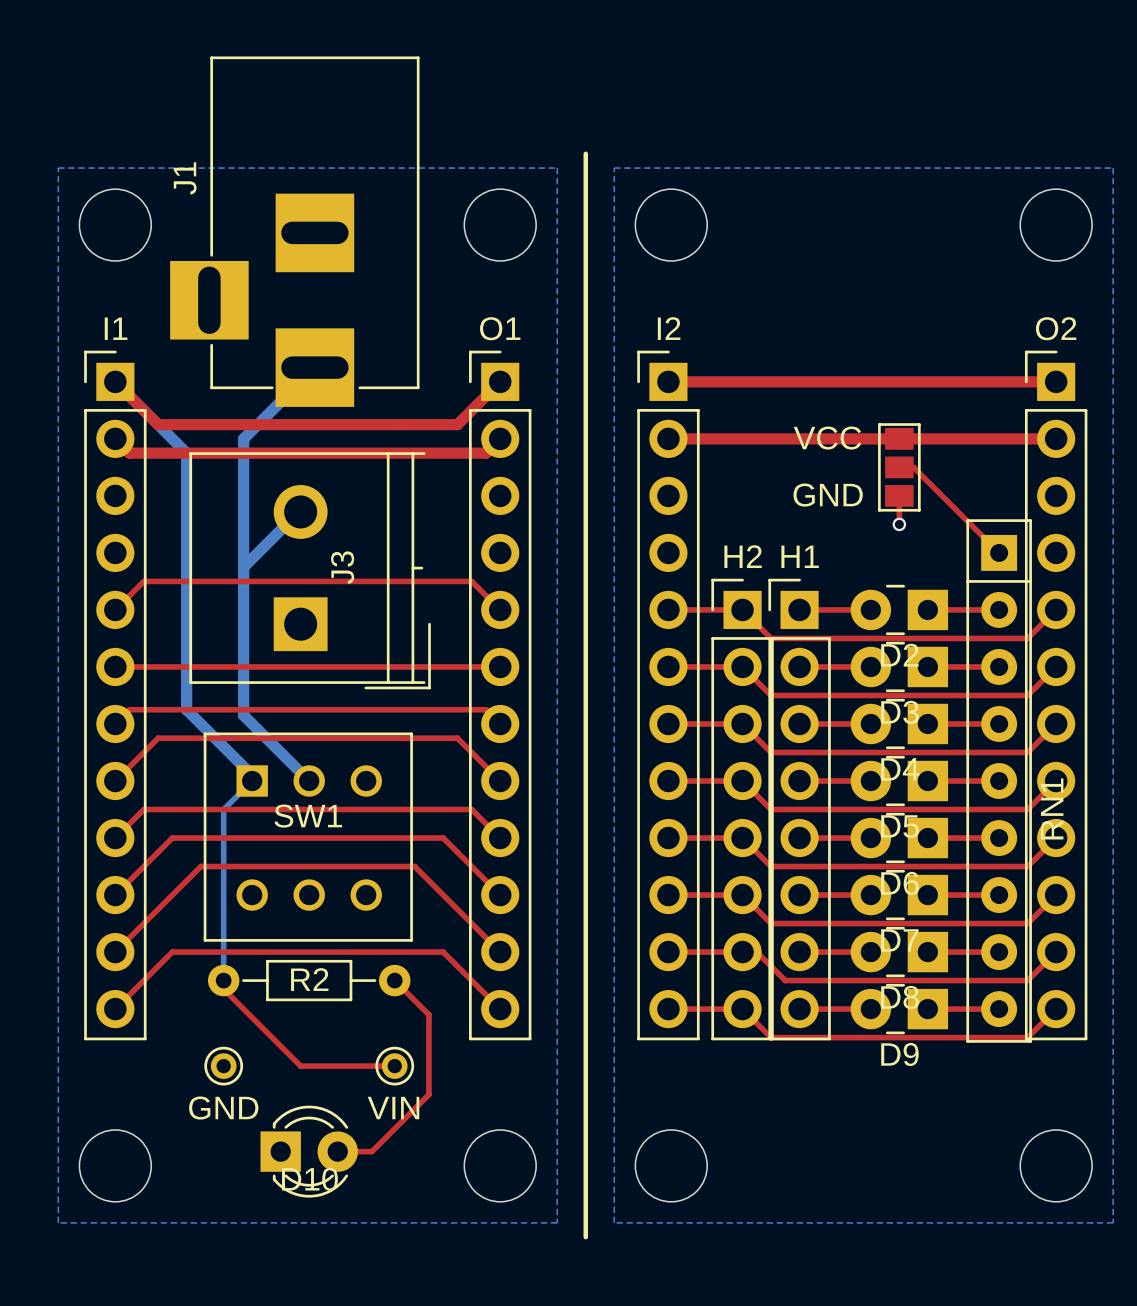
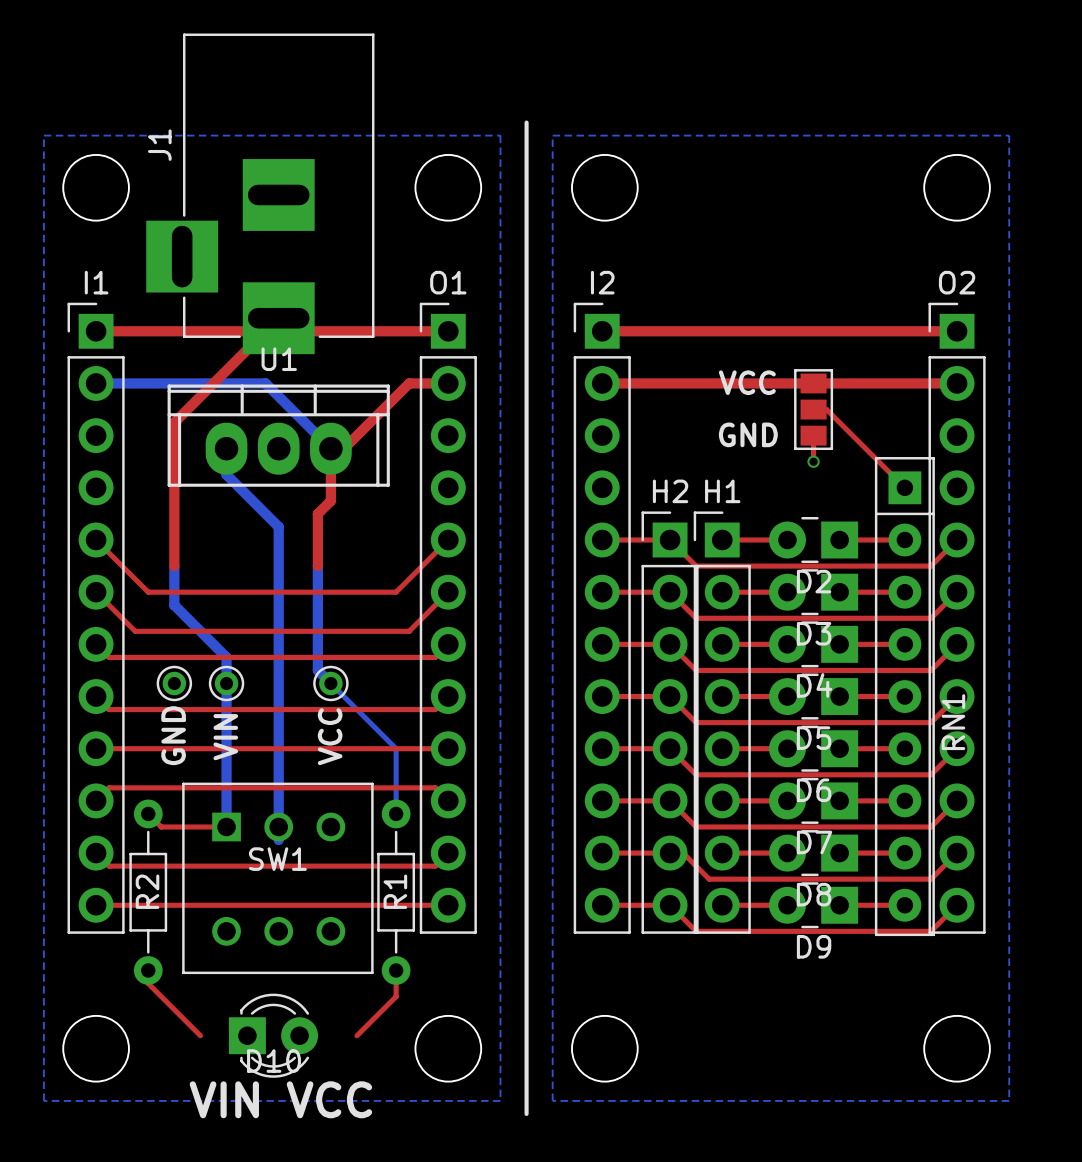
top track: none -> (278, 318) (174, 422) (174, 566)
bottom track: (314, 367) (243, 438) (243, 715) (309, 781) -> none
top track: (115, 381) (158, 424) (457, 424) (500, 381) -> (96, 331) (252, 331)
bottom track: (115, 381) (186, 453) (186, 709) (252, 775) (252, 781) (223, 809) (223, 980) -> none
top track: none -> (304, 331) (448, 331)
top track: (115, 438) (129, 453) (485, 453) (500, 438) -> (317, 566) (317, 513) (330, 500) (330, 448) (343, 448) (409, 383) (448, 383)
bottom track: none -> (96, 383) (265, 383) (330, 448)
U1: none -> (278, 435)
bottom track: none -> (226, 448) (226, 474) (278, 526) (278, 840)
bottom track: (300, 511) (243, 567) -> none
J3: (310, 570) -> none
top track: (115, 609) (143, 581) (471, 581) (500, 609) -> (96, 540) (148, 592)
top track: none -> (448, 540) (396, 592)
bottom track: none -> (174, 566) (174, 605) (226, 657) (226, 826)
bottom track: none -> (317, 566) (317, 670) (396, 748) (396, 813)
top track: (115, 666) (172, 666) -> (96, 592) (135, 631)
top track: (443, 666) (500, 666) -> (409, 631) (448, 592)
top track: (158, 709) (129, 709) (115, 723) -> (135, 657) (109, 657) (96, 644)
top track: (457, 709) (485, 709) (500, 723) -> (409, 657) (435, 657) (448, 644)
top track: (158, 738) (115, 781) -> (448, 696) (435, 709) (109, 709) (96, 696)
top track: (457, 738) (500, 781) -> none
part: none -> (174, 683)
part: none -> (226, 683)
part: none -> (330, 683)
text: none -> VCC (330, 736)
text: none -> VIN (225, 737)
SW1 position: (308, 837) -> (277, 878)
top track: (115, 838) (143, 809) (471, 809) (500, 838) -> none
top track: (172, 838) (129, 880) -> (148, 748) (96, 748)
top track: (443, 838) (485, 880) -> (396, 748) (448, 748)
top track: none -> (109, 787) (435, 787)
top track: none -> (148, 813) (161, 826) (226, 826)
top track: (115, 952) (200, 866) (414, 866) (500, 952) -> (96, 853) (109, 866) (435, 866) (448, 853)
top track: (223, 980) (223, 989) (300, 1066) (394, 1066) -> none
R2 rotation: 0° (309, 980) -> 90° clockwise (148, 892)
R2 position: (309, 980) -> (148, 892)
top track: (394, 980) (428, 1014) (428, 1094) (371, 1151) (337, 1151) -> none
R1: none -> (396, 892)
top track: (115, 1009) (172, 952) (443, 952) (500, 1009) -> (96, 905) (448, 905)
part: (223, 1066) -> none
part: (394, 1066) -> none
top track: none -> (148, 970) (148, 983) (200, 1035)
top track: none -> (396, 970) (396, 996) (356, 1035)
text rotation: 0° (223, 1108) -> 90° counterclockwise (173, 735)
text position: GND (223, 1108) -> GND (173, 735)
text: VIN (393, 1108) -> none
text: none -> VIN (224, 1099)
text: none -> VCC (329, 1099)

